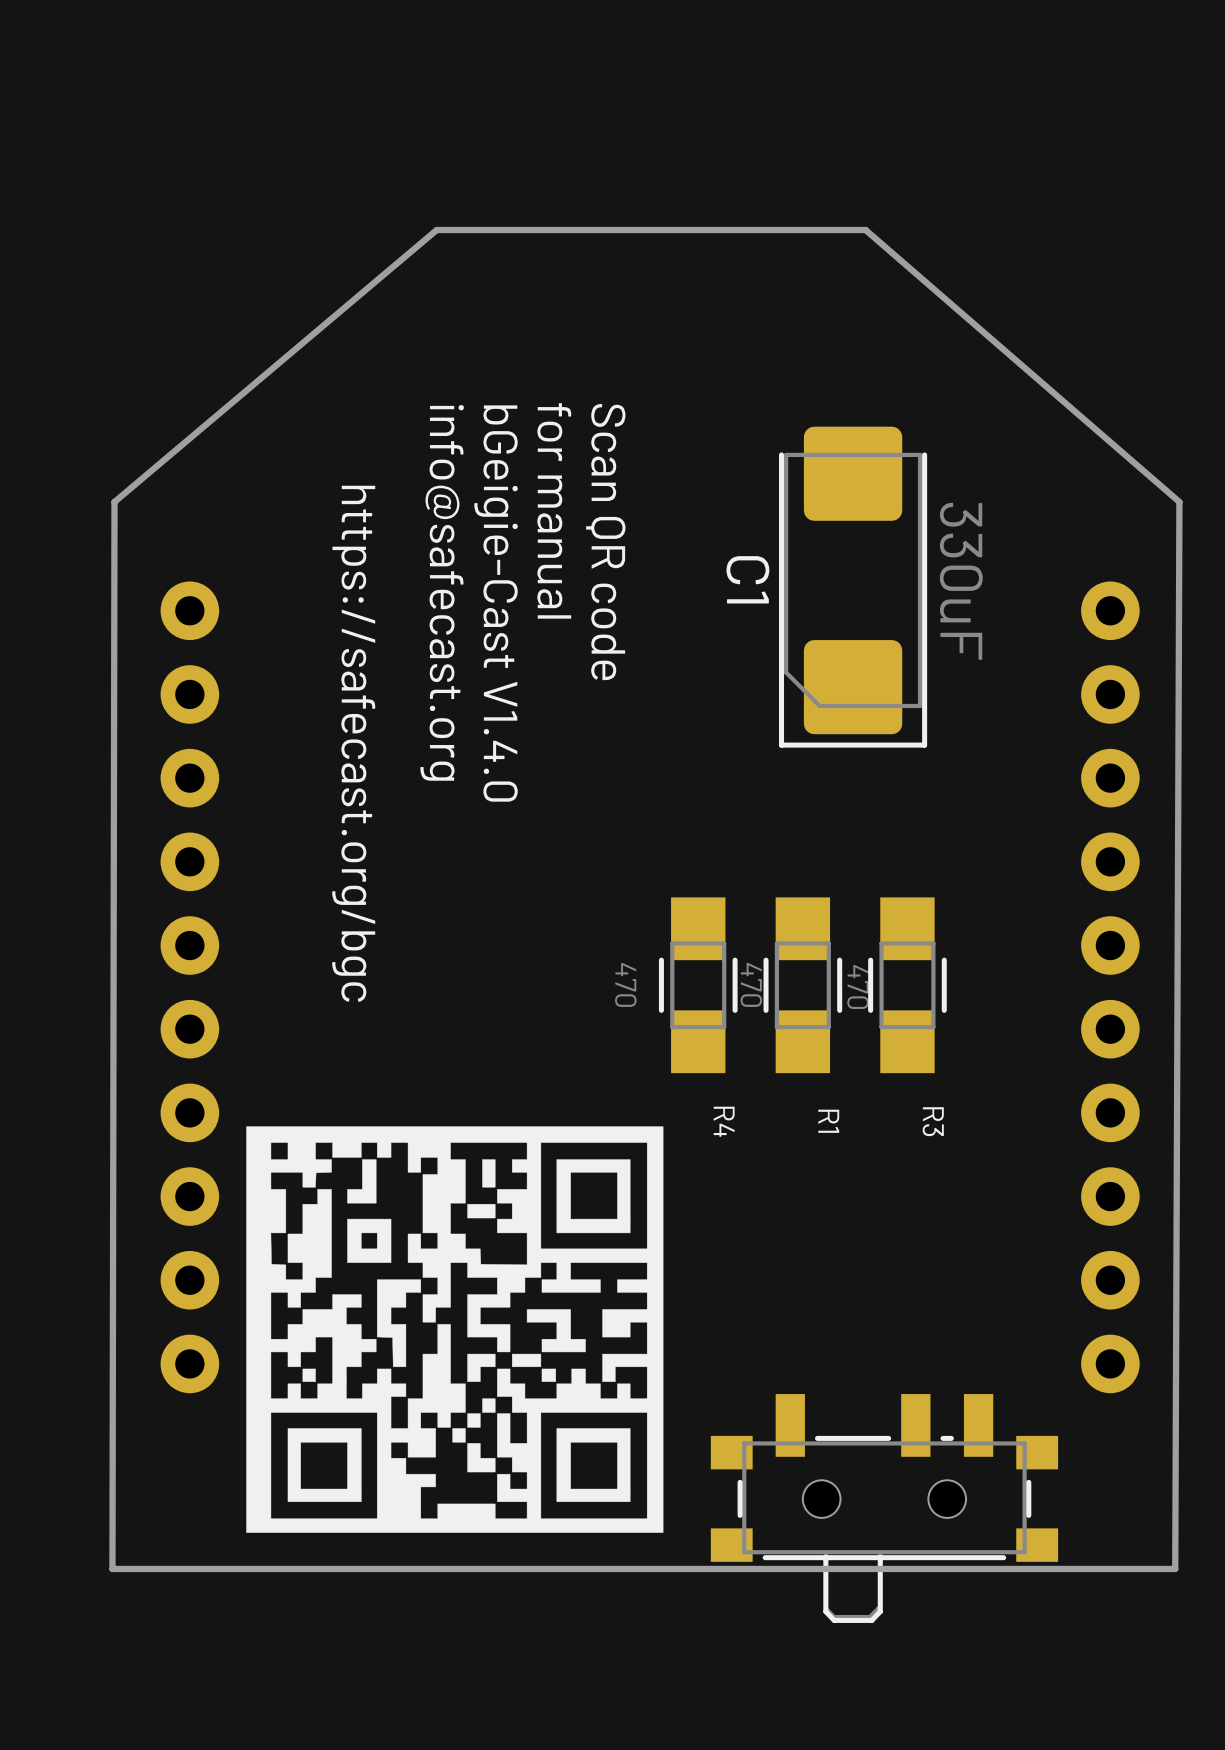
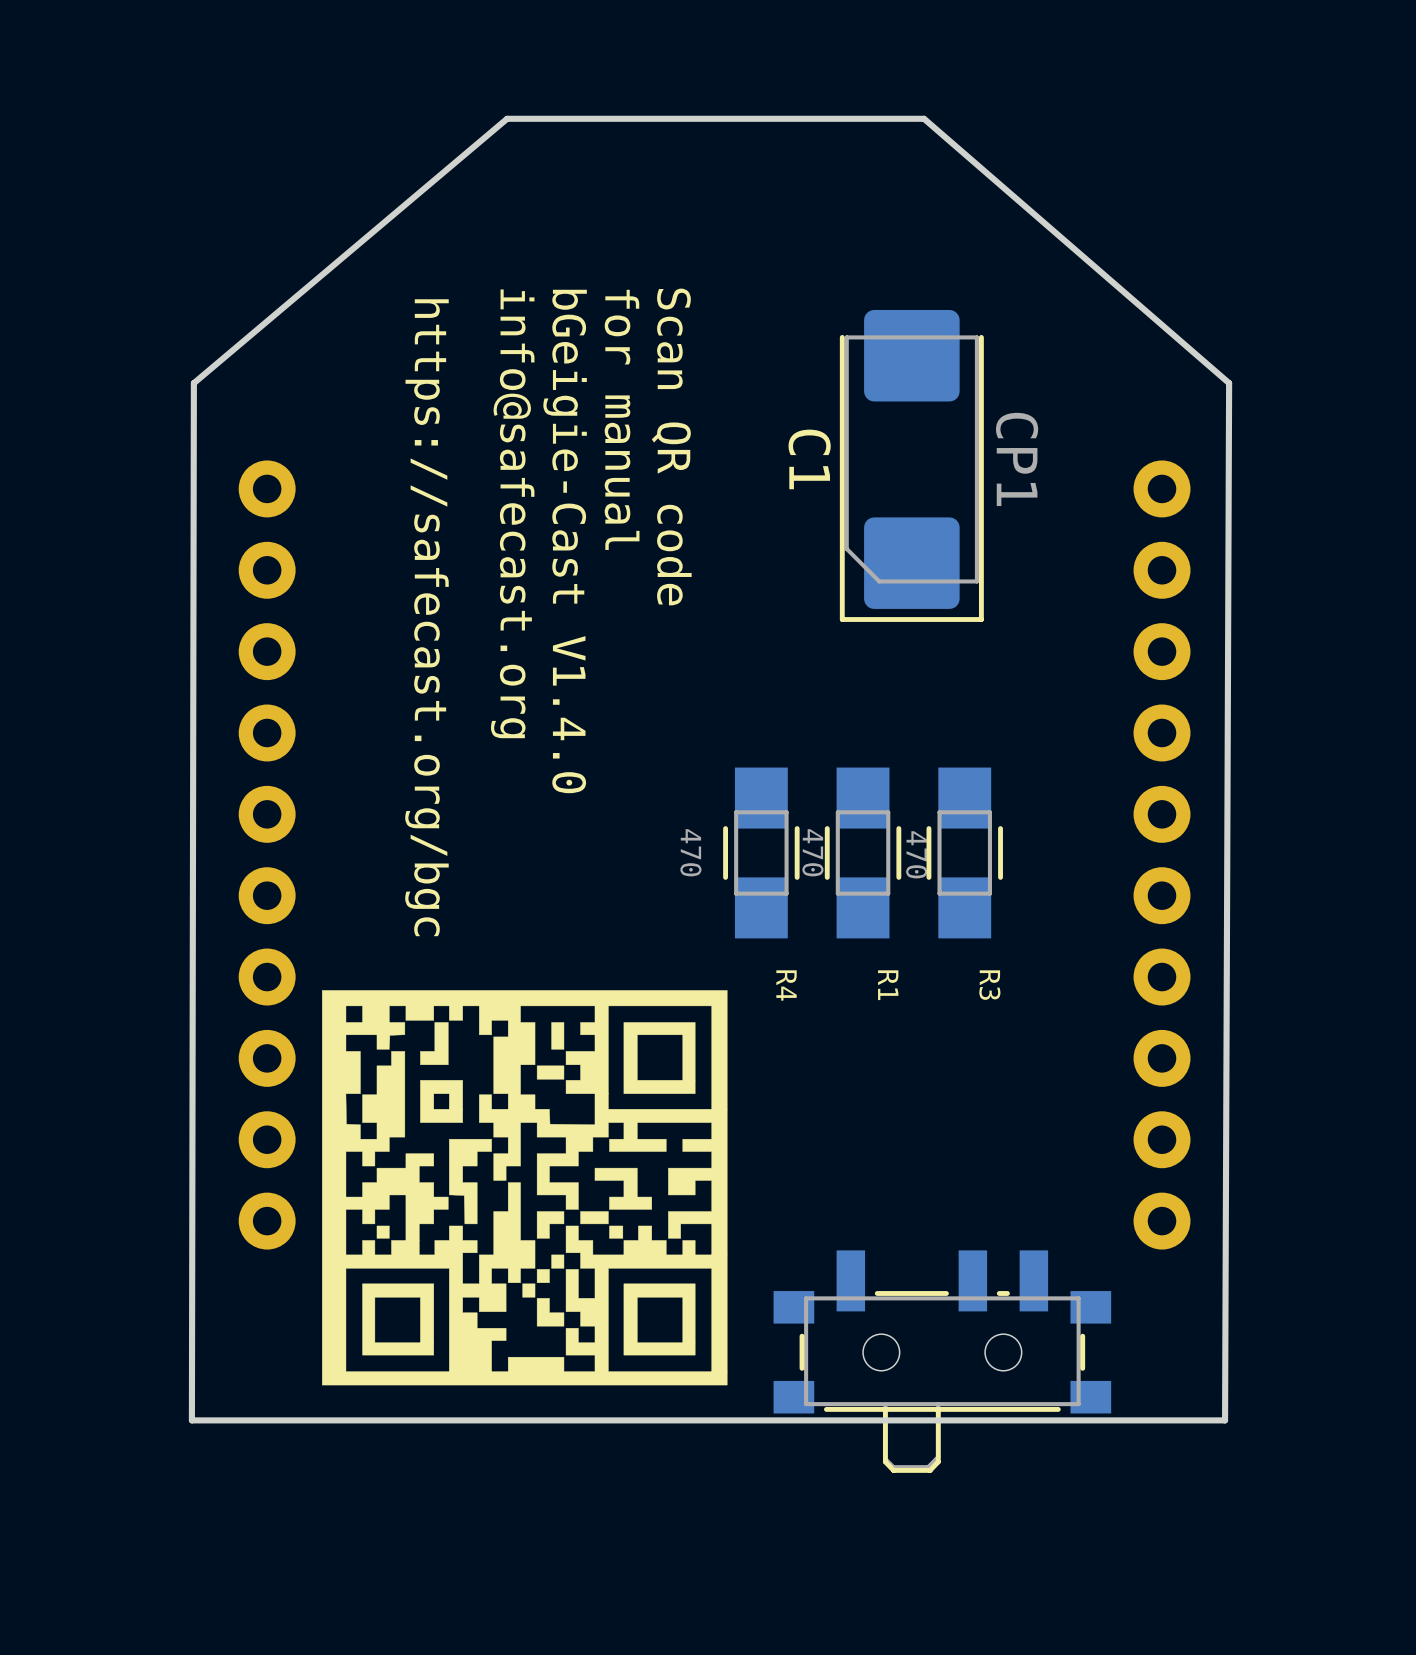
C1 value: 330uF (961, 581) -> CP1 (1017, 459)

